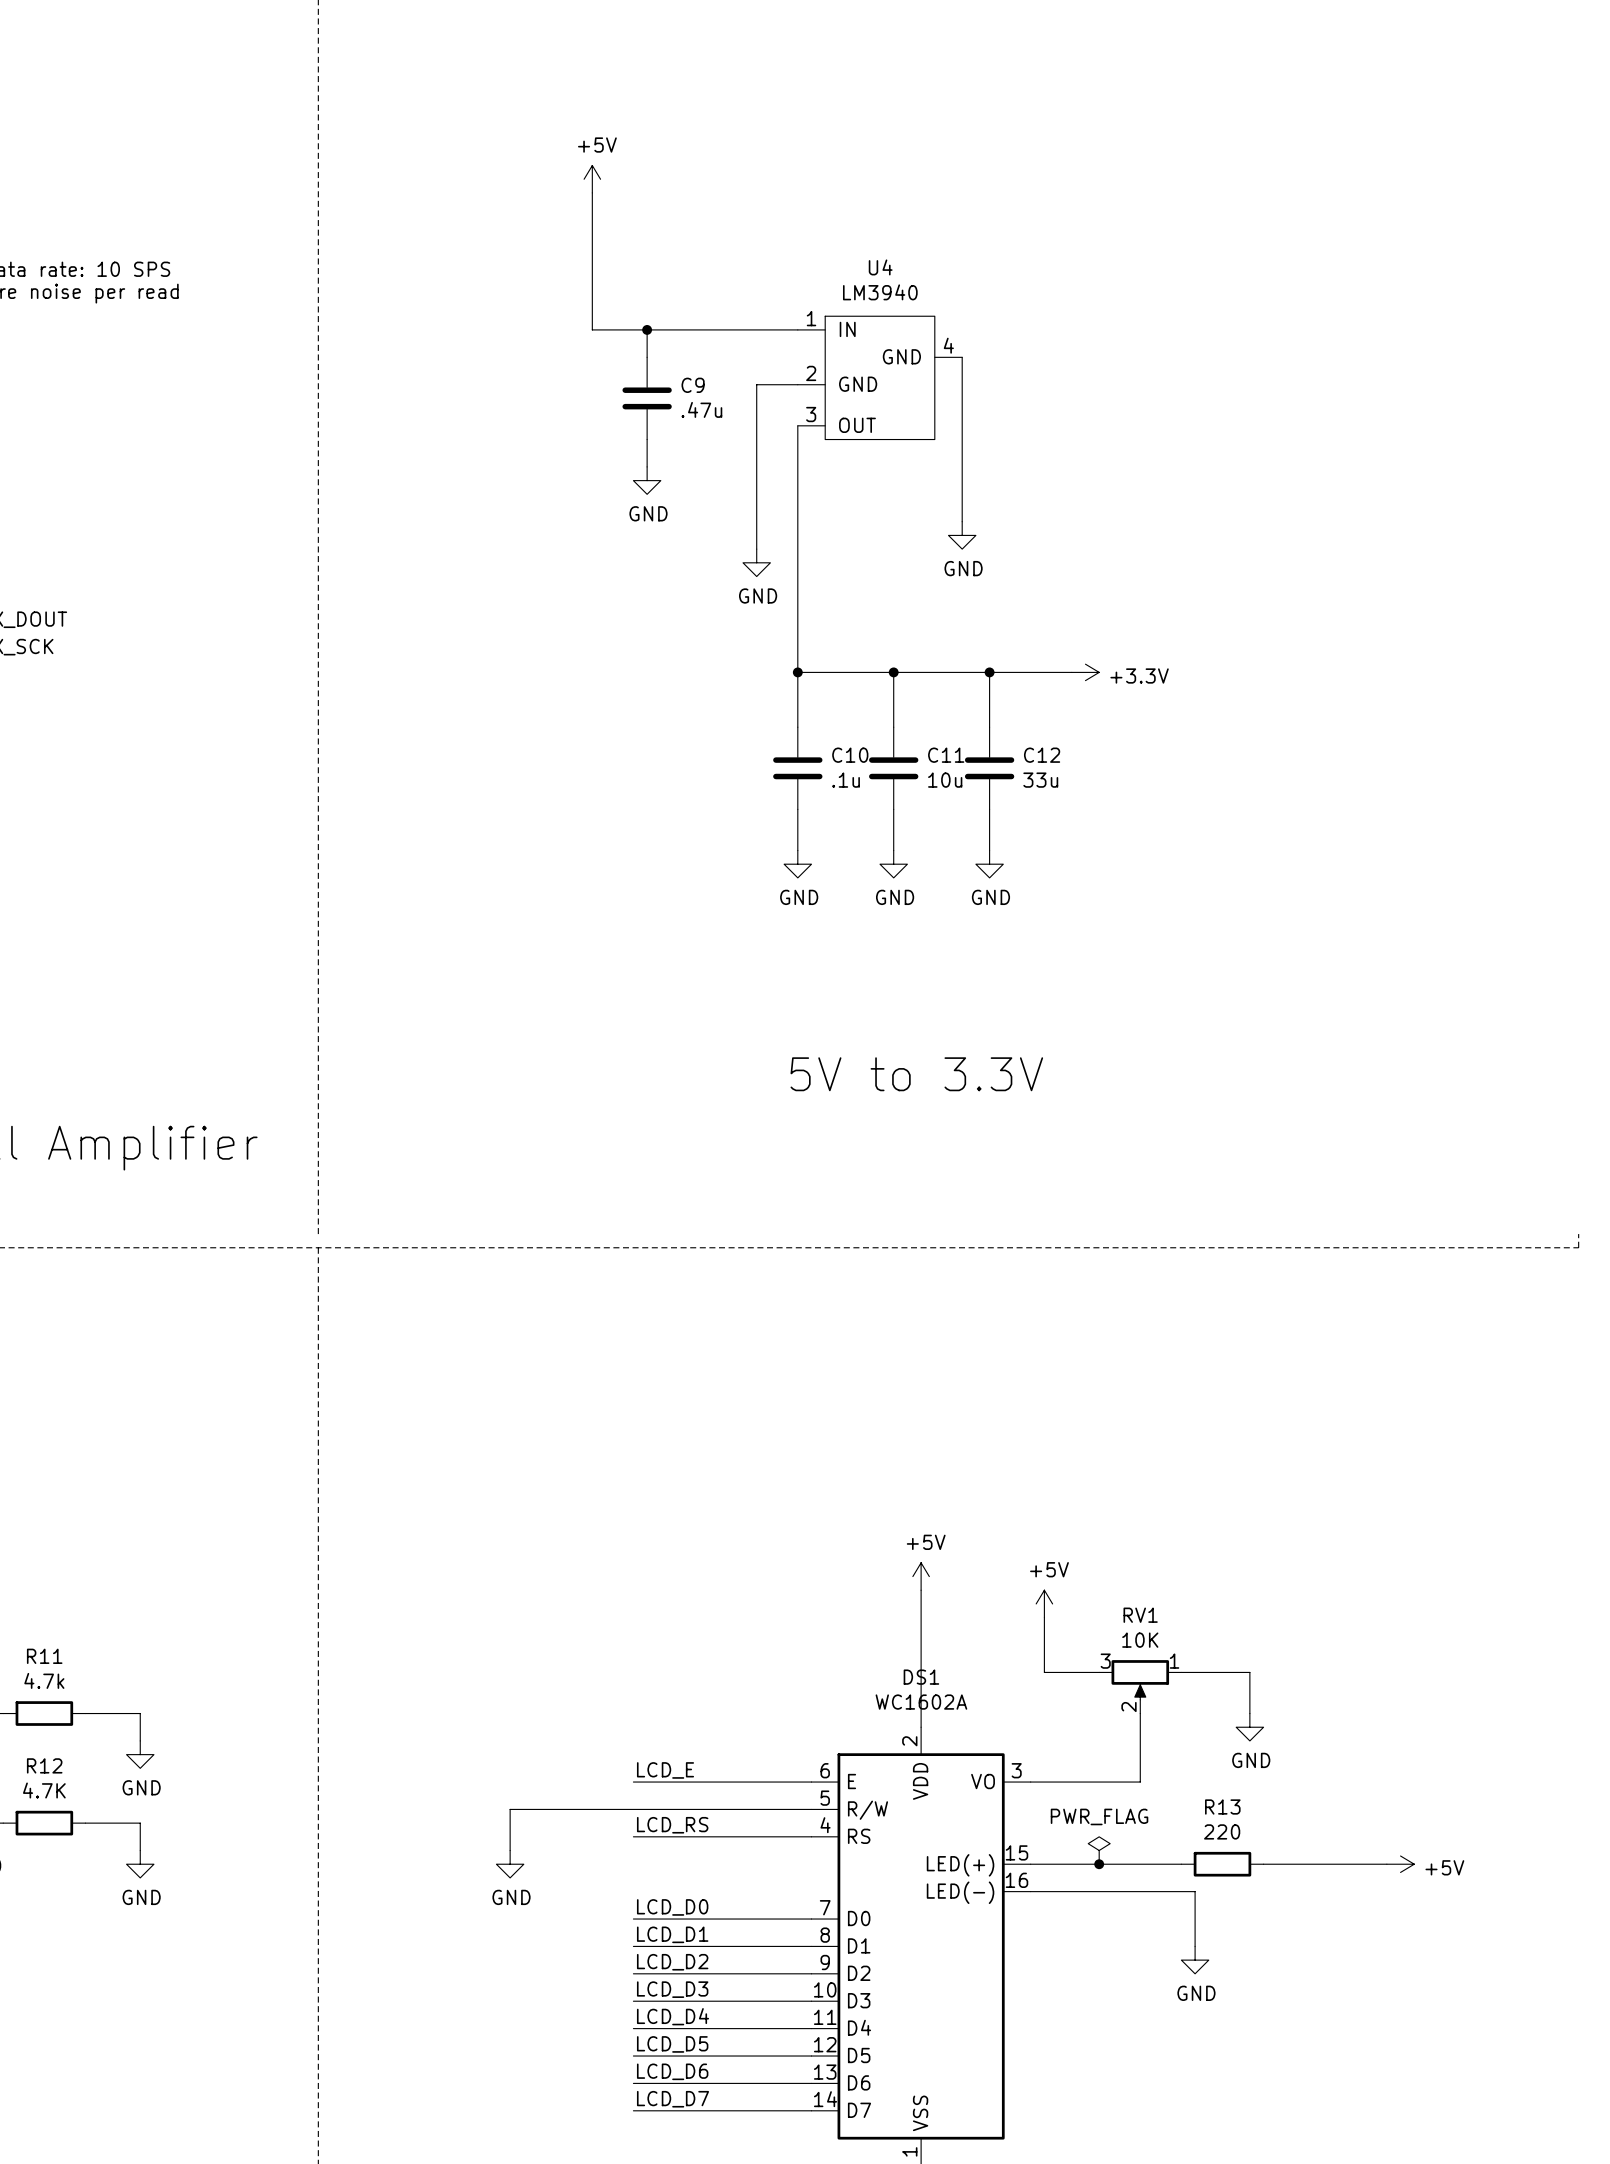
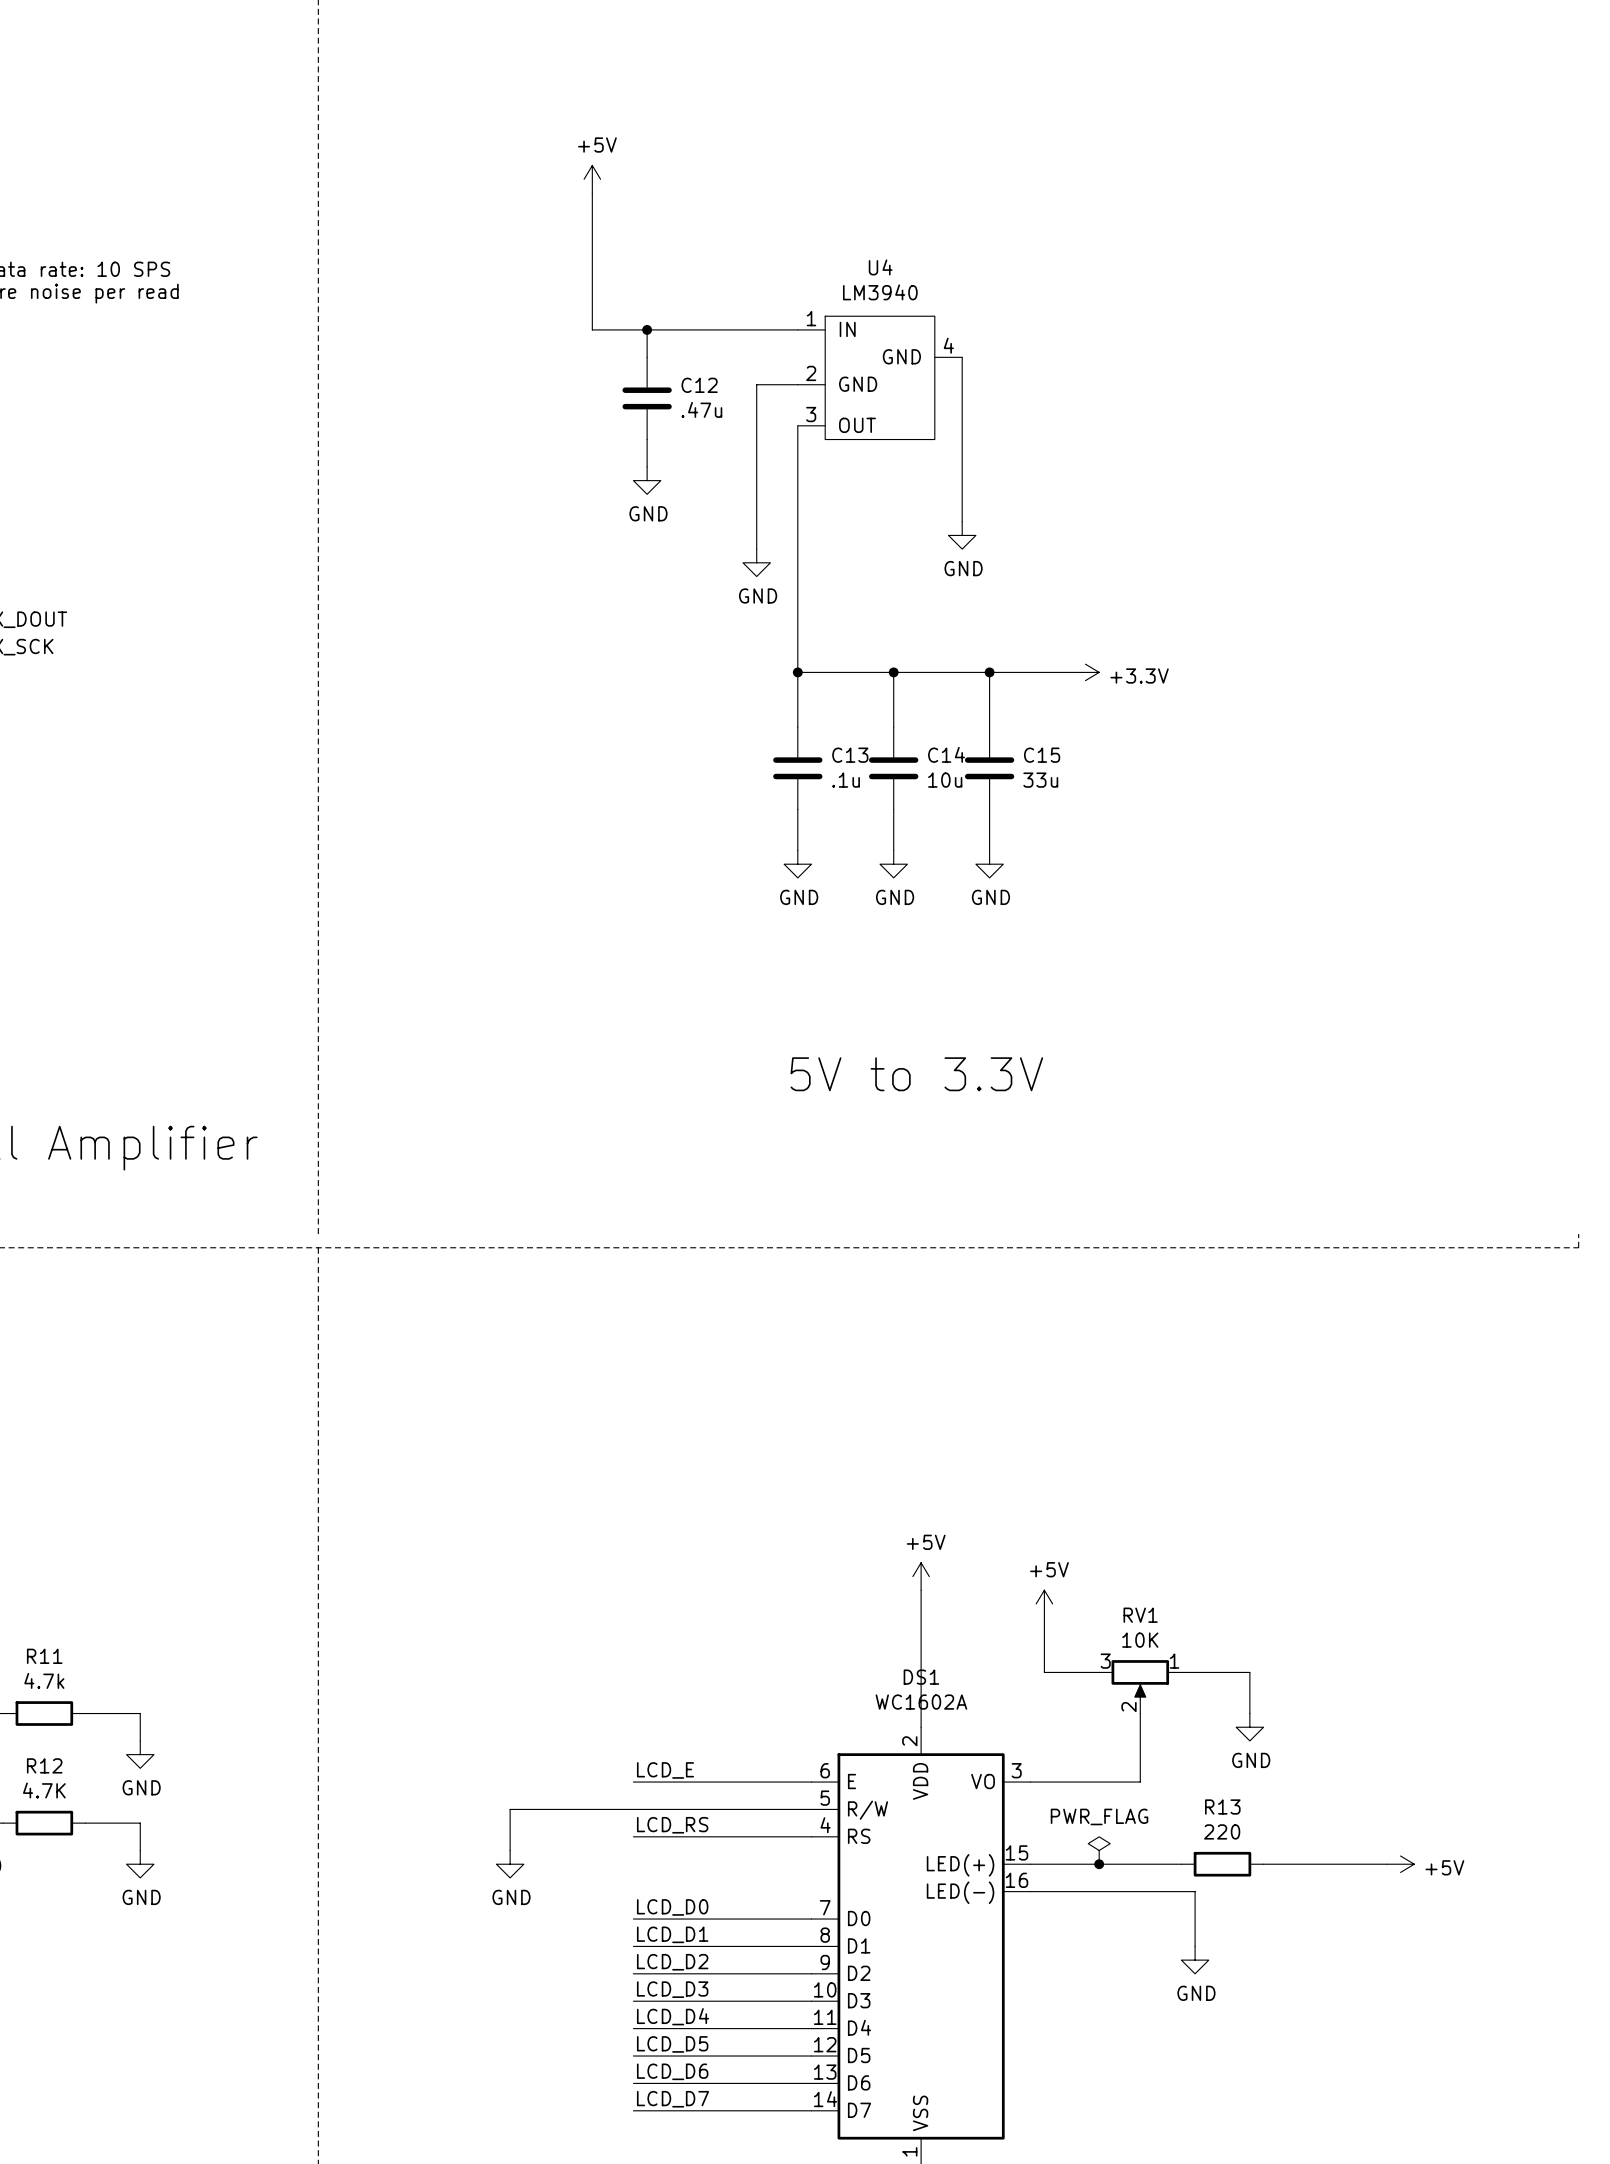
C9 name: C9 (693, 385) -> C12 (699, 385)
C10 name: C10 (850, 755) -> C13 (850, 755)
C11 name: C11 (946, 755) -> C14 (946, 754)
C12 name: C12 (1042, 755) -> C15 (1042, 755)

